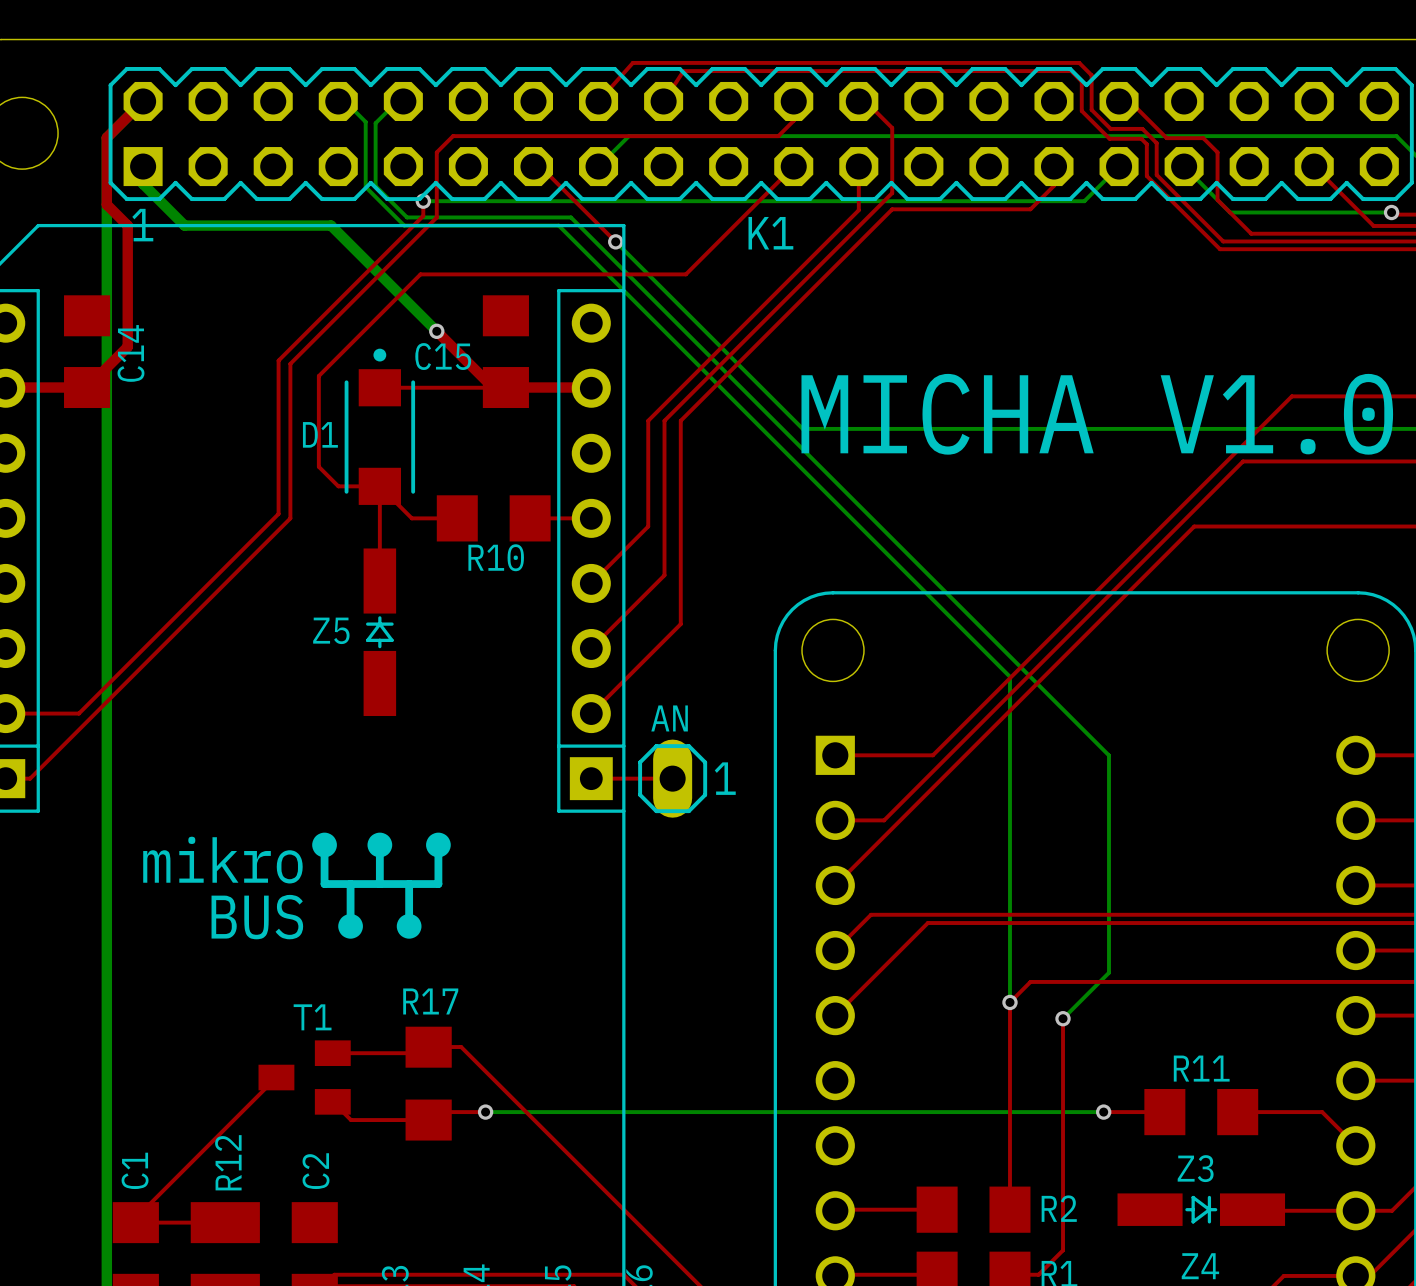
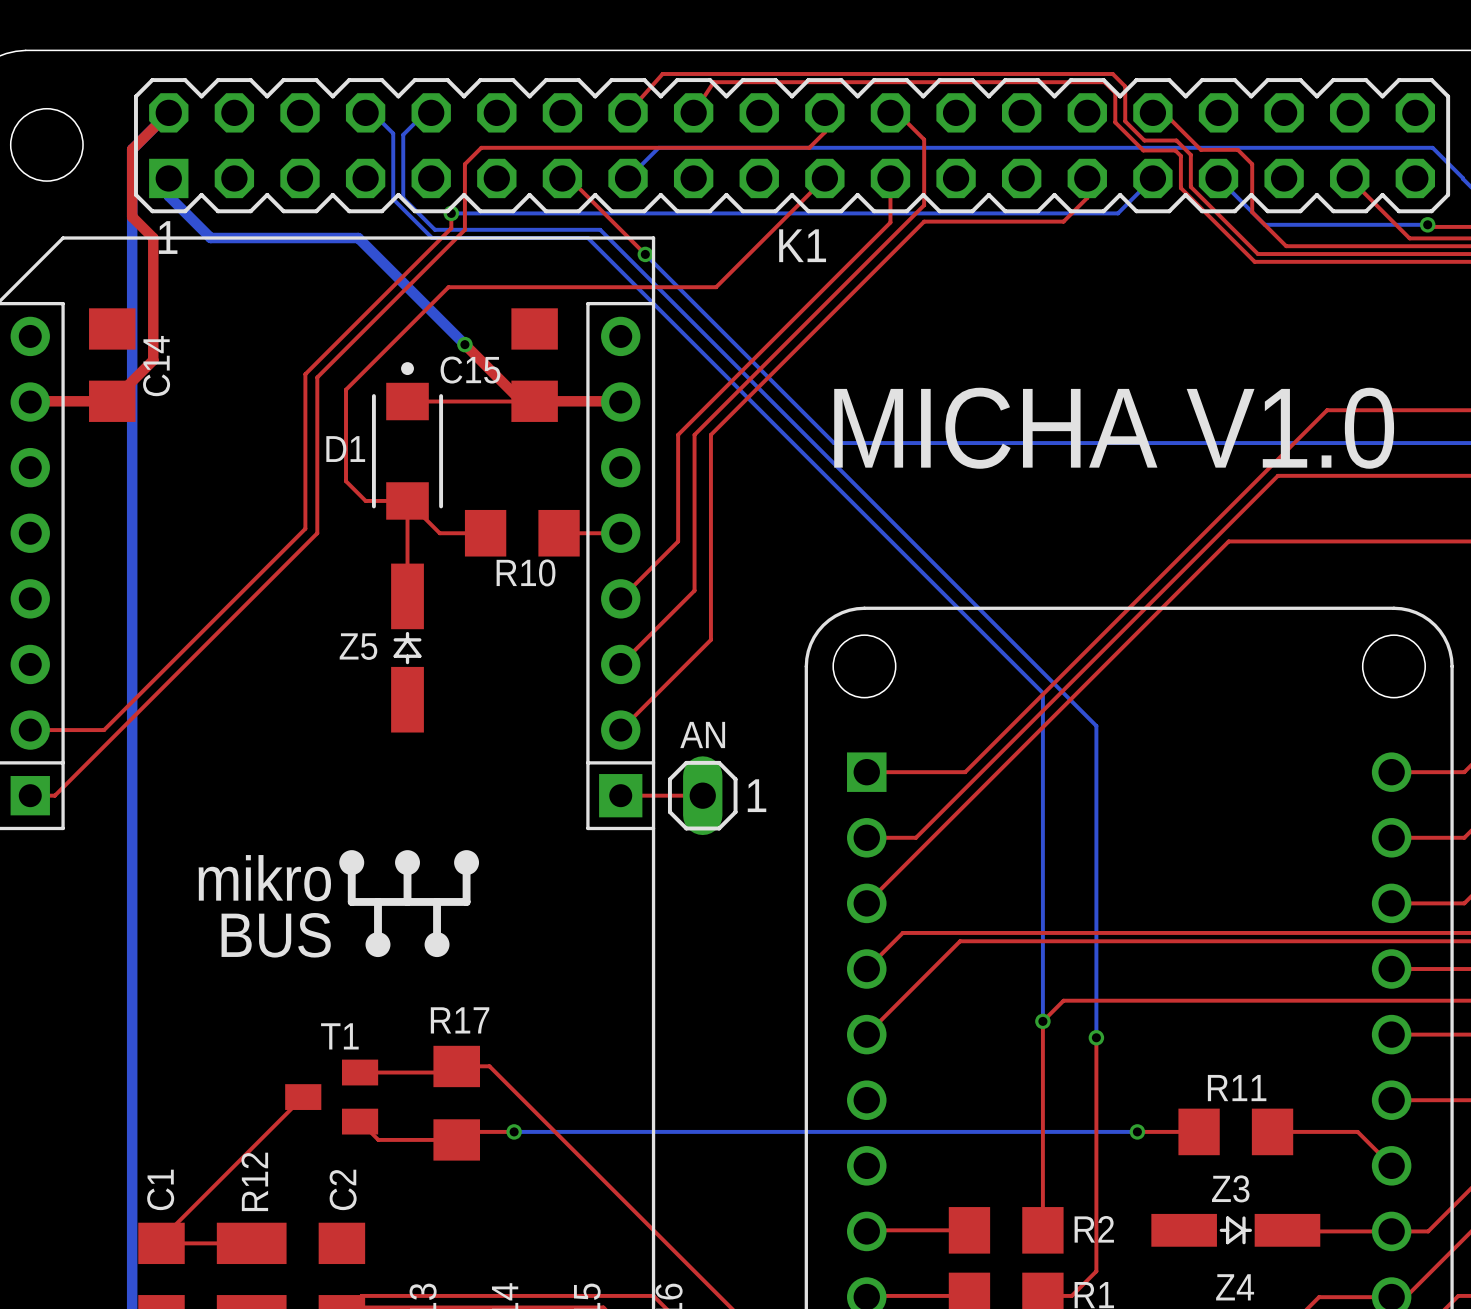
bottom track: (1063, 709) (1109, 755) (1109, 972) (1063, 1018) -> (1096, 725) (1096, 1037)

